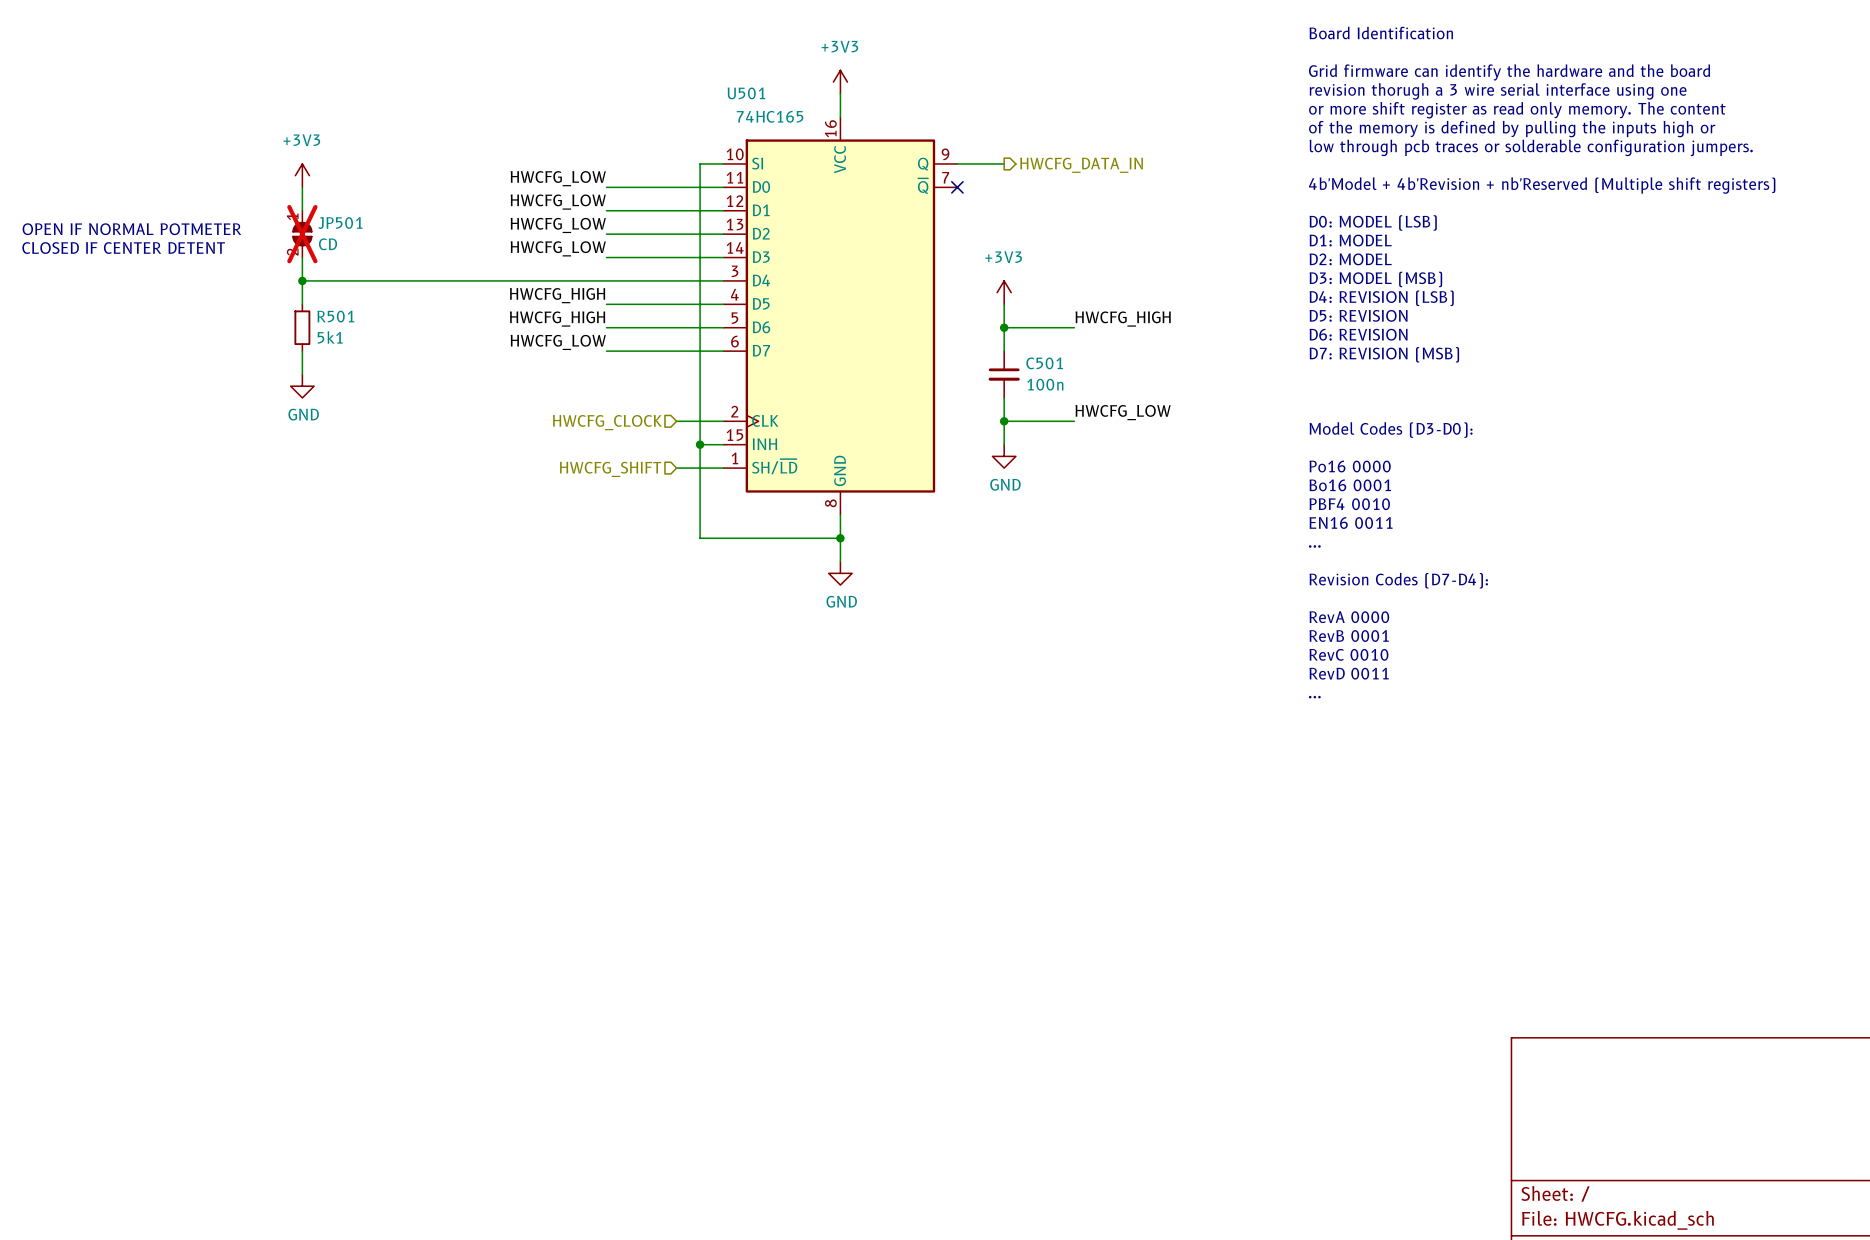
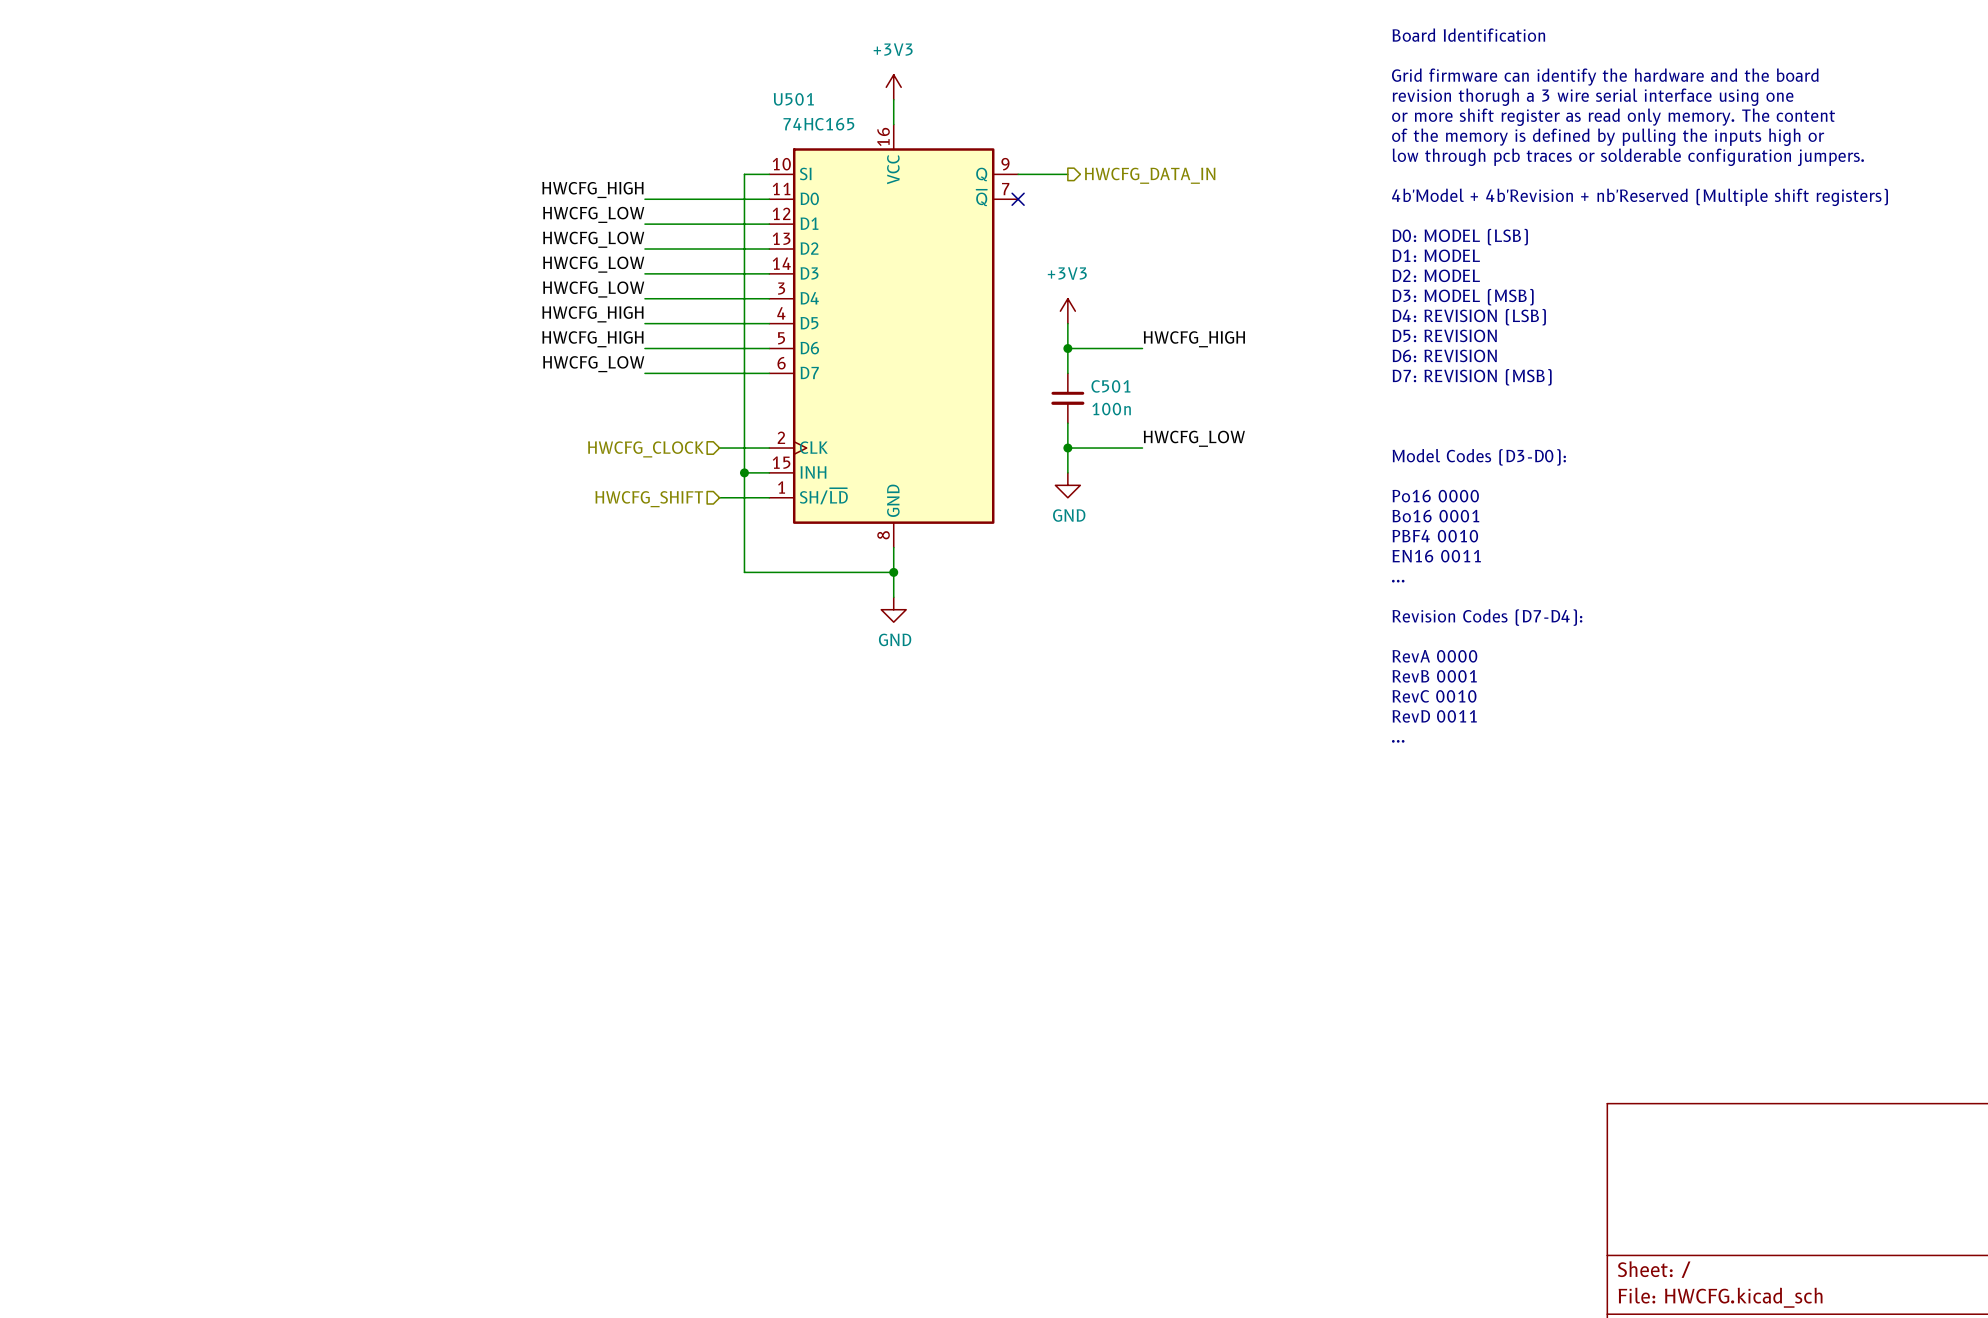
power symbol: +3V3 (302, 175) -> none
label: HWCFG_LOW (558, 178) -> HWCFG_HIGH (592, 190)
wire: (302, 187) (302, 210) -> none
text: OPEN IF NORMAL POTMETER (131, 229) -> none
JP501: CD (302, 234) -> none
text: CLOSED IF CENTER DETENT (123, 248) -> none
wire: (302, 257) (302, 304) -> none
label: none -> HWCFG_LOW (593, 289)
wire: (302, 280) (606, 280) -> none
junction: (302, 280) -> none
R501: 5k1 (302, 327) -> none
wire: (302, 351) (302, 374) -> none
power symbol: GND (302, 386) -> none

